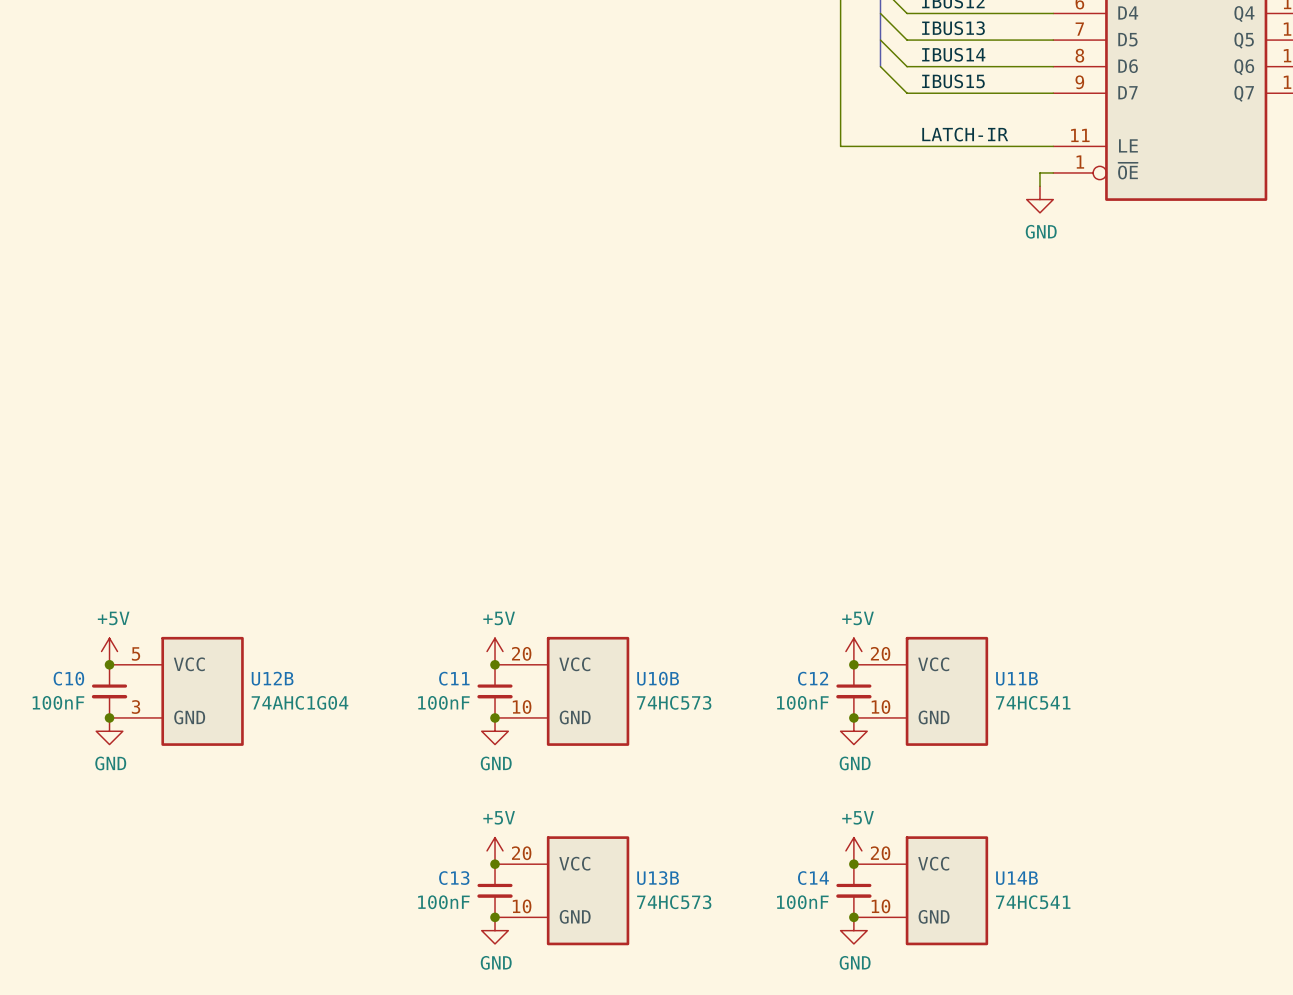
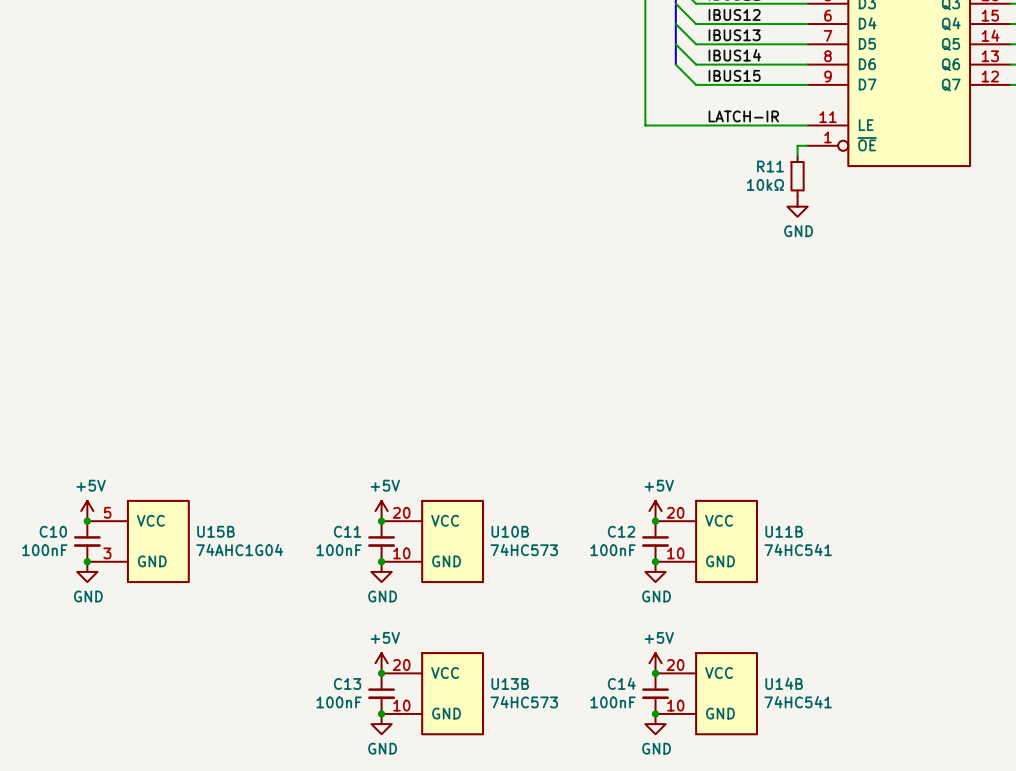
power symbol position: GND (1039, 199) -> GND (797, 206)
R11: none -> 10kΩ (797, 176)
U12B name: U12B (272, 678) -> U15B (215, 531)

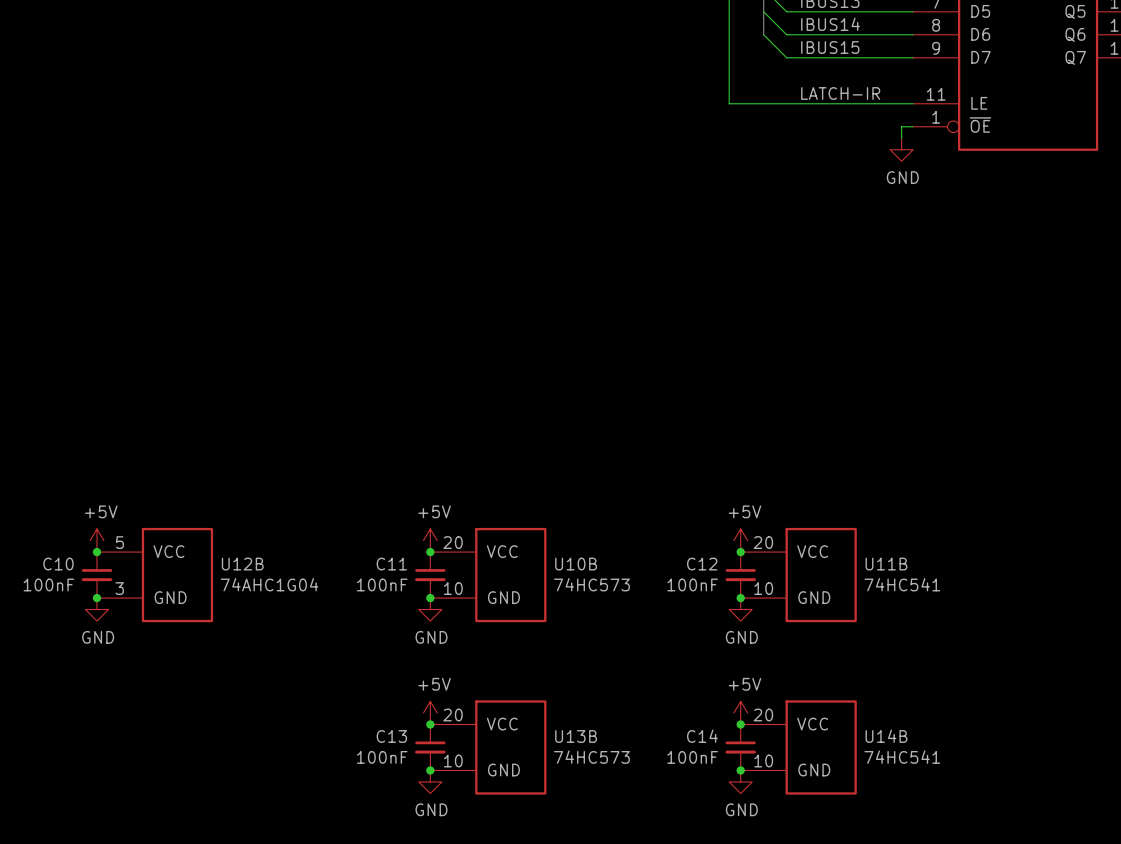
R11: 10kΩ (797, 176) -> none
power symbol position: GND (797, 206) -> GND (901, 149)
U15B name: U15B (215, 531) -> U12B (242, 564)

